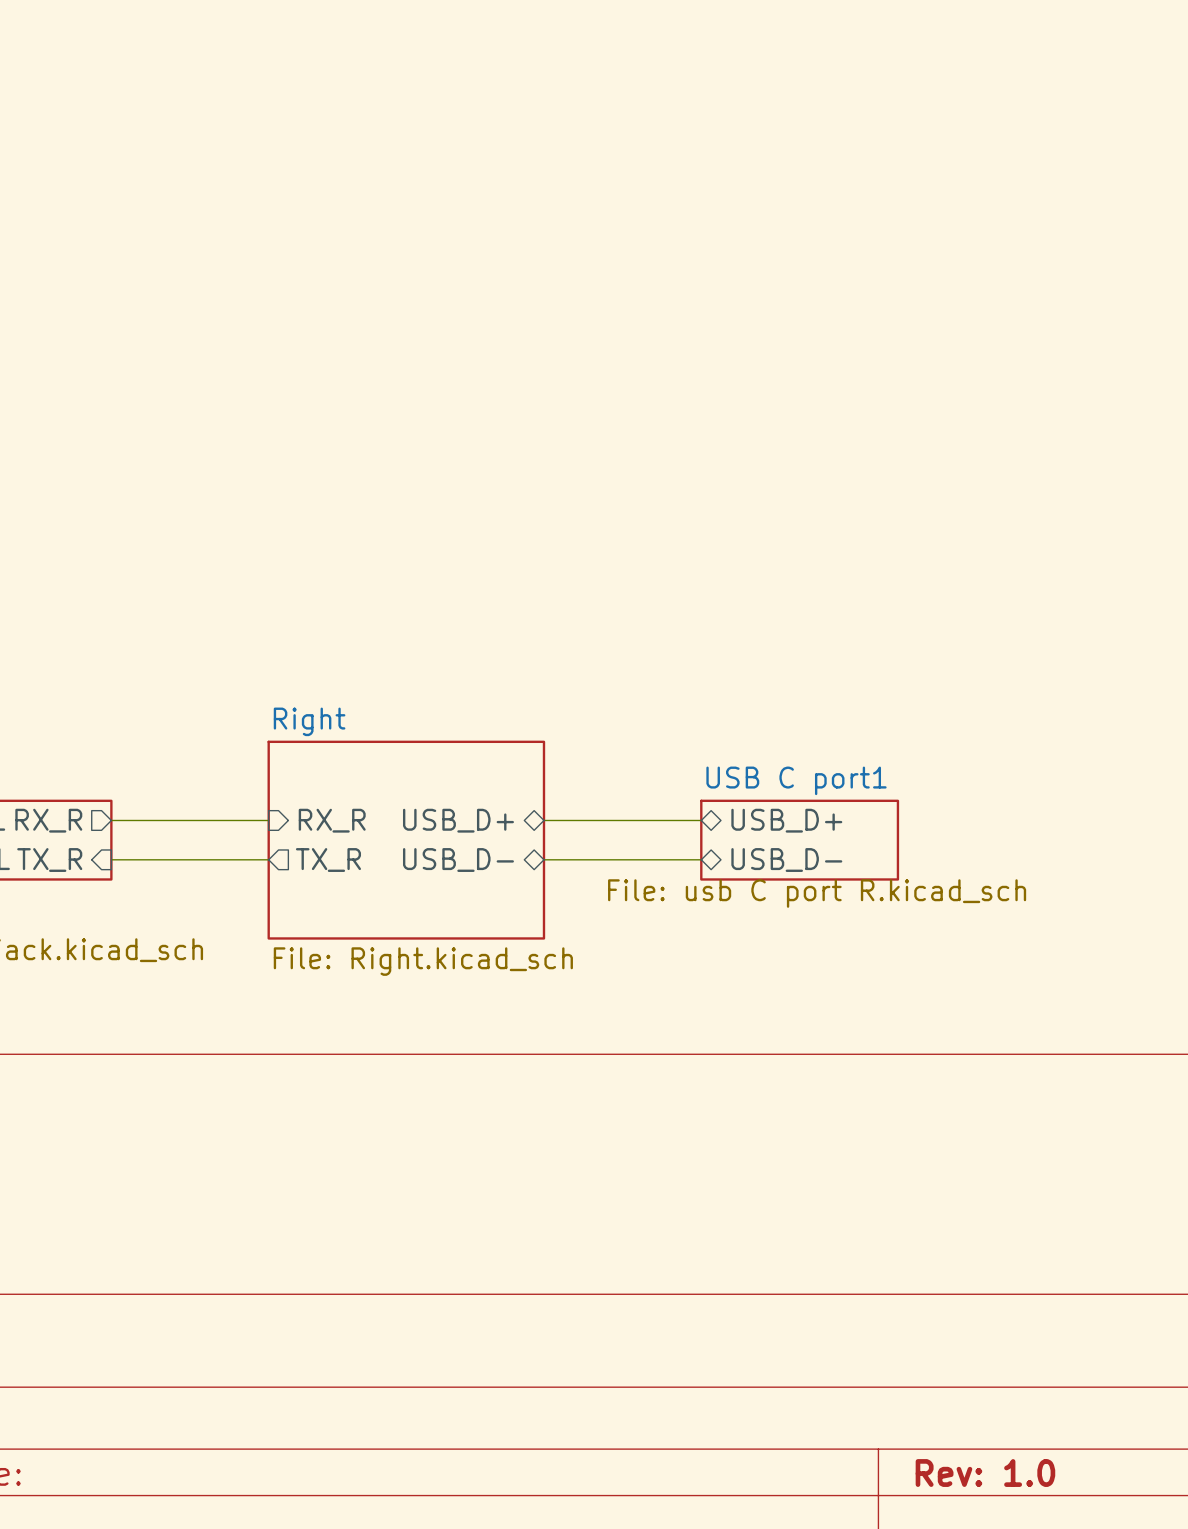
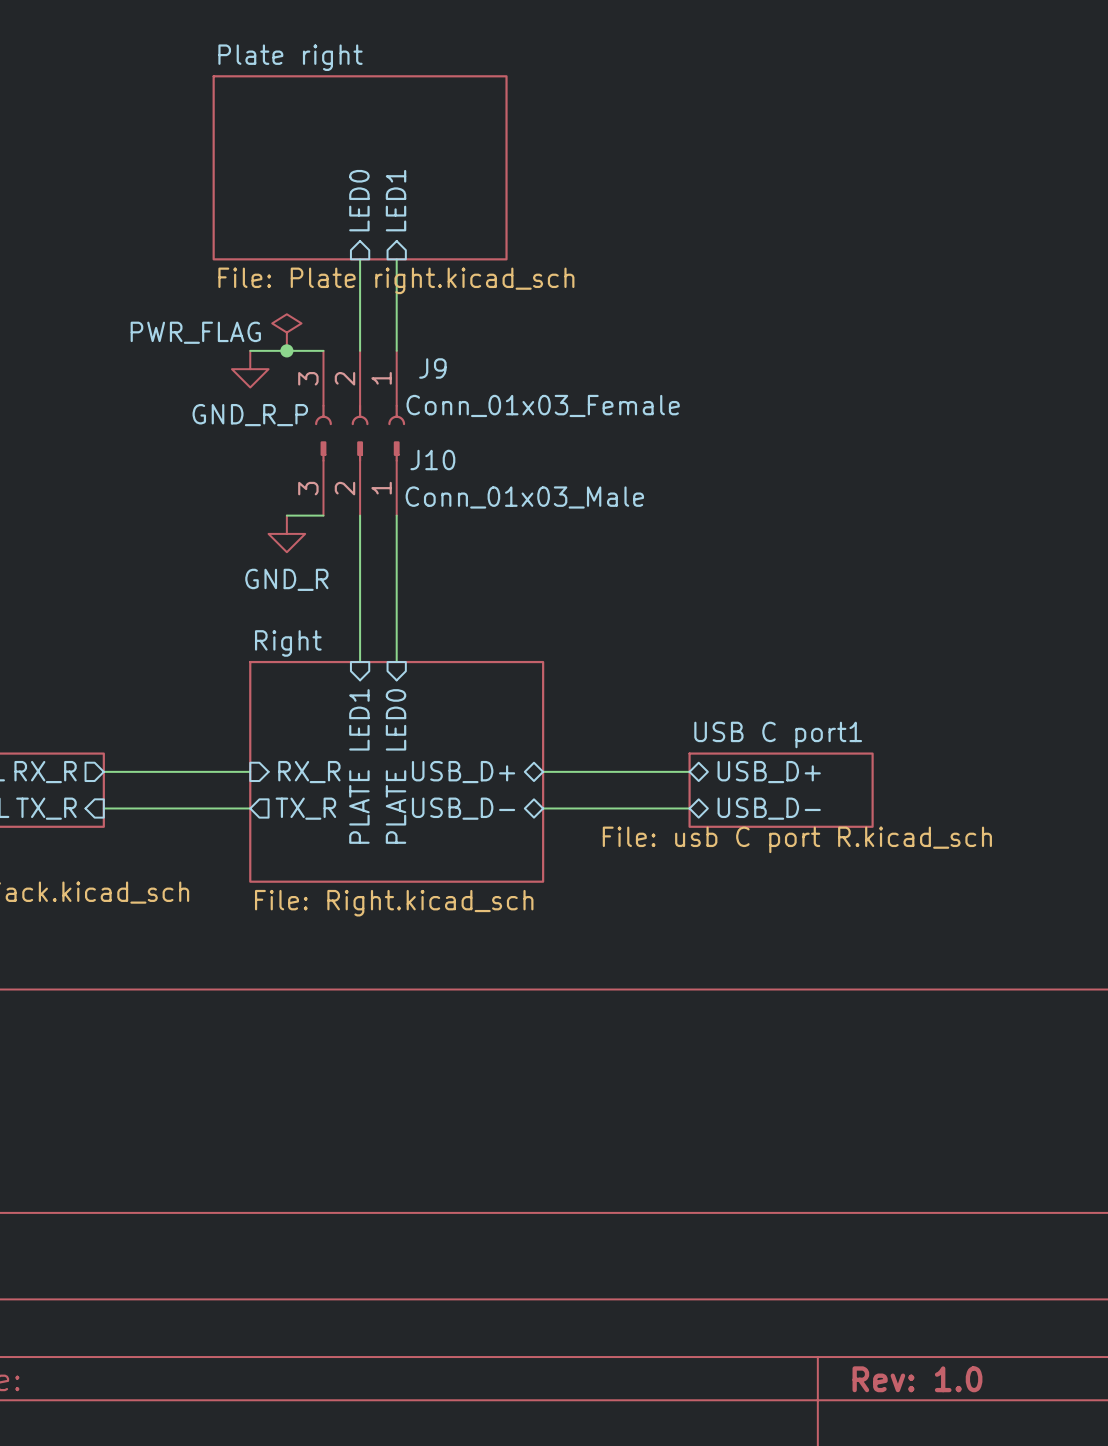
sheet Plate right: none -> File: Plate right.kicad_sch (360, 167)
sheet pin: none -> LED0 (359, 200)
sheet pin: none -> LED1 (396, 200)
wire: none -> (360, 259) (360, 350)
wire: none -> (396, 259) (396, 350)
power symbol: none -> PWR_FLAG (286, 332)
wire: none -> (250, 350) (323, 350)
junction: none -> (286, 350)
power symbol: none -> GND_R_P (250, 369)
J9: none -> Conn_01x03_Female (360, 388)
J10: none -> Conn_01x03_Male (360, 478)
wire: none -> (286, 515) (323, 515)
wire: none -> (360, 515) (360, 662)
wire: none -> (396, 515) (396, 662)
power symbol: none -> GND_R (286, 533)
sheet pin: none -> PLATE LED1 (359, 766)
sheet pin: none -> PLATE LED0 (396, 766)
sheet Right: none -> File: Right.kicad_sch (396, 771)
sheet pin position: USB_D+ (458, 820) -> USB_D+ (463, 772)
wire: (543, 820) (583, 820) -> (652, 771) (689, 771)
sheet pin position: USB_D+ (786, 820) -> USB_D+ (769, 772)
sheet Right: File: Right.kicad_sch (406, 840) -> none
sheet USB C port1 position: (799, 840) -> (781, 790)
wire: (543, 859) (583, 859) -> (652, 808) (689, 808)
sheet pin position: USB_D- (458, 860) -> USB_D- (463, 808)
sheet pin position: USB_D- (786, 860) -> USB_D- (769, 808)

